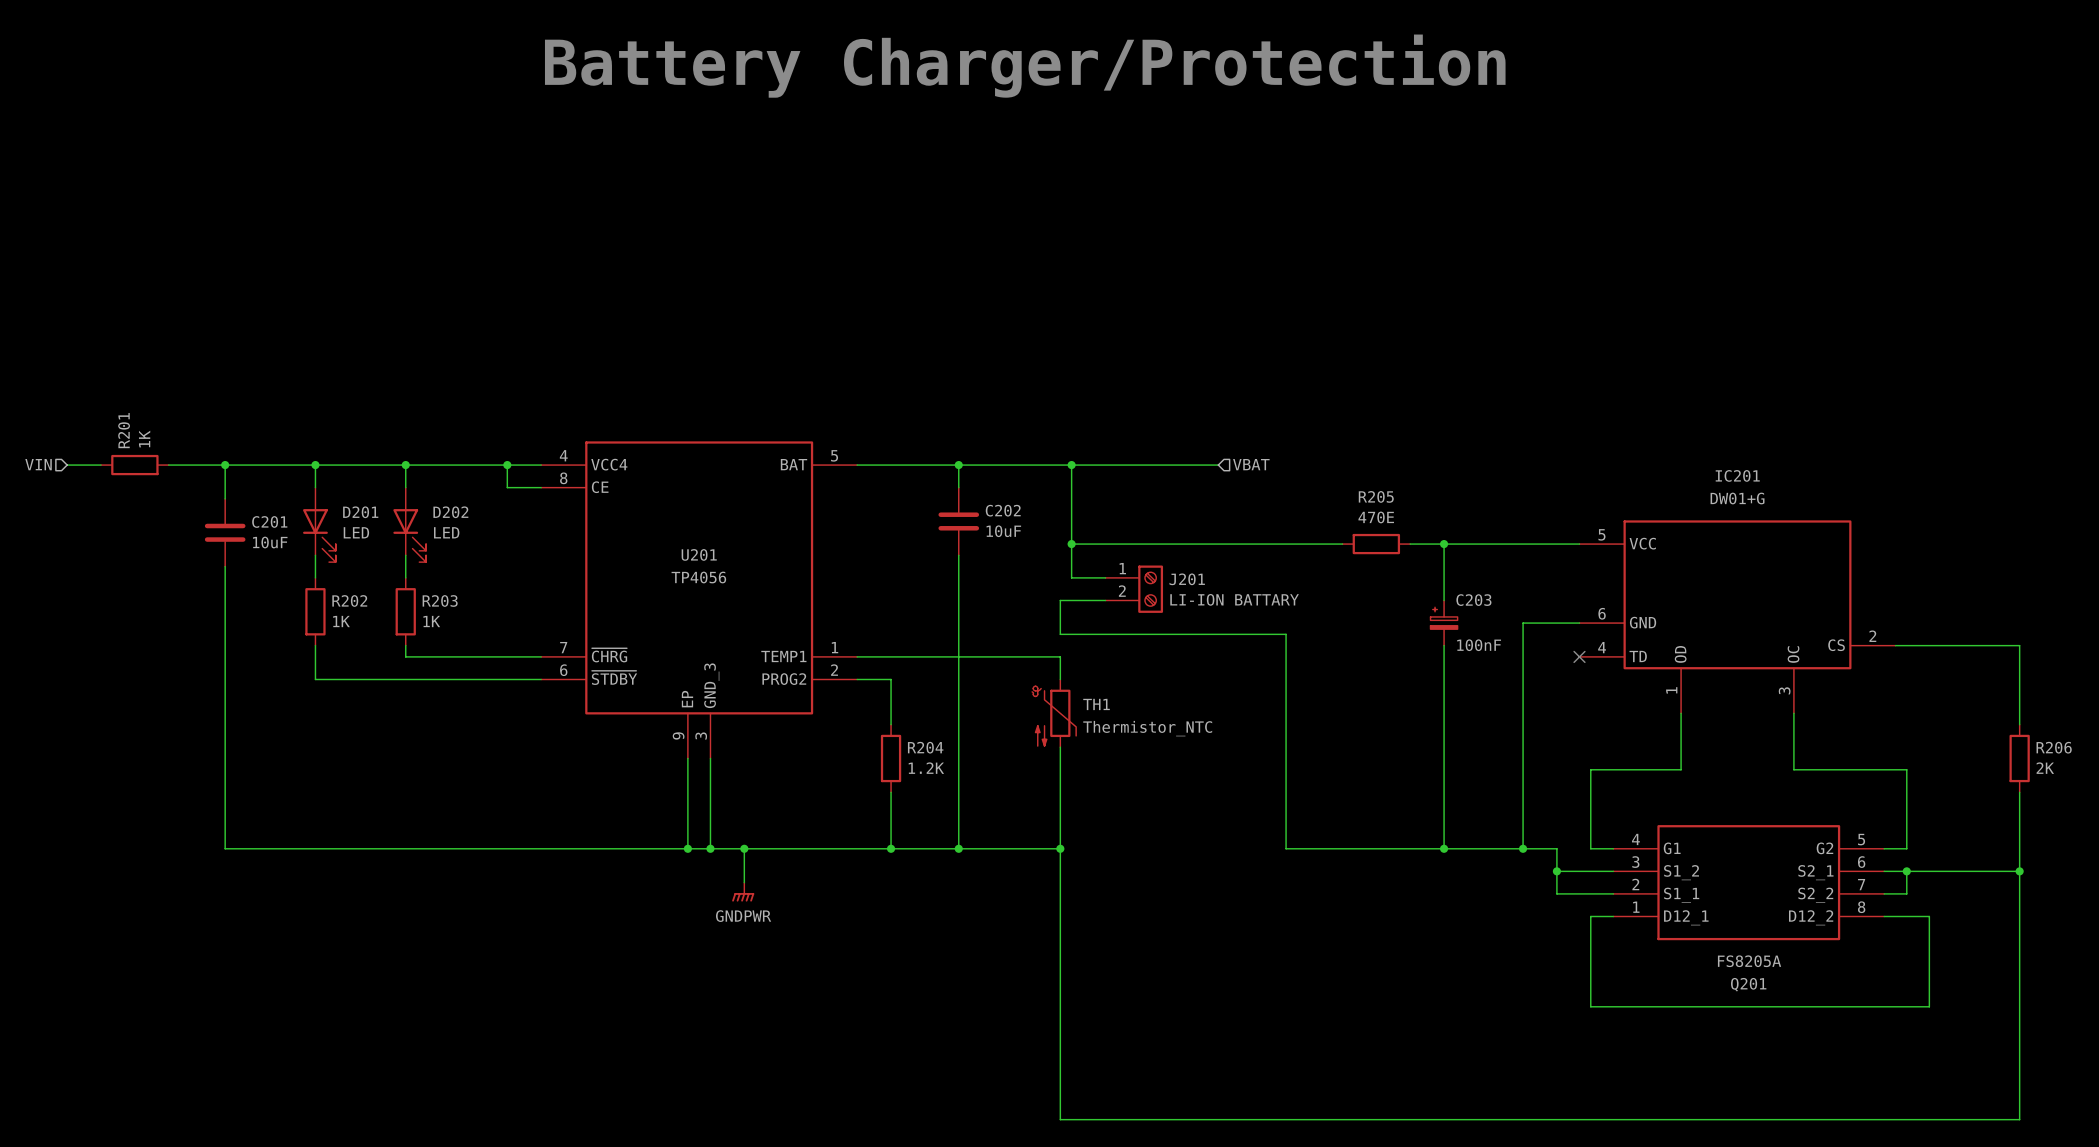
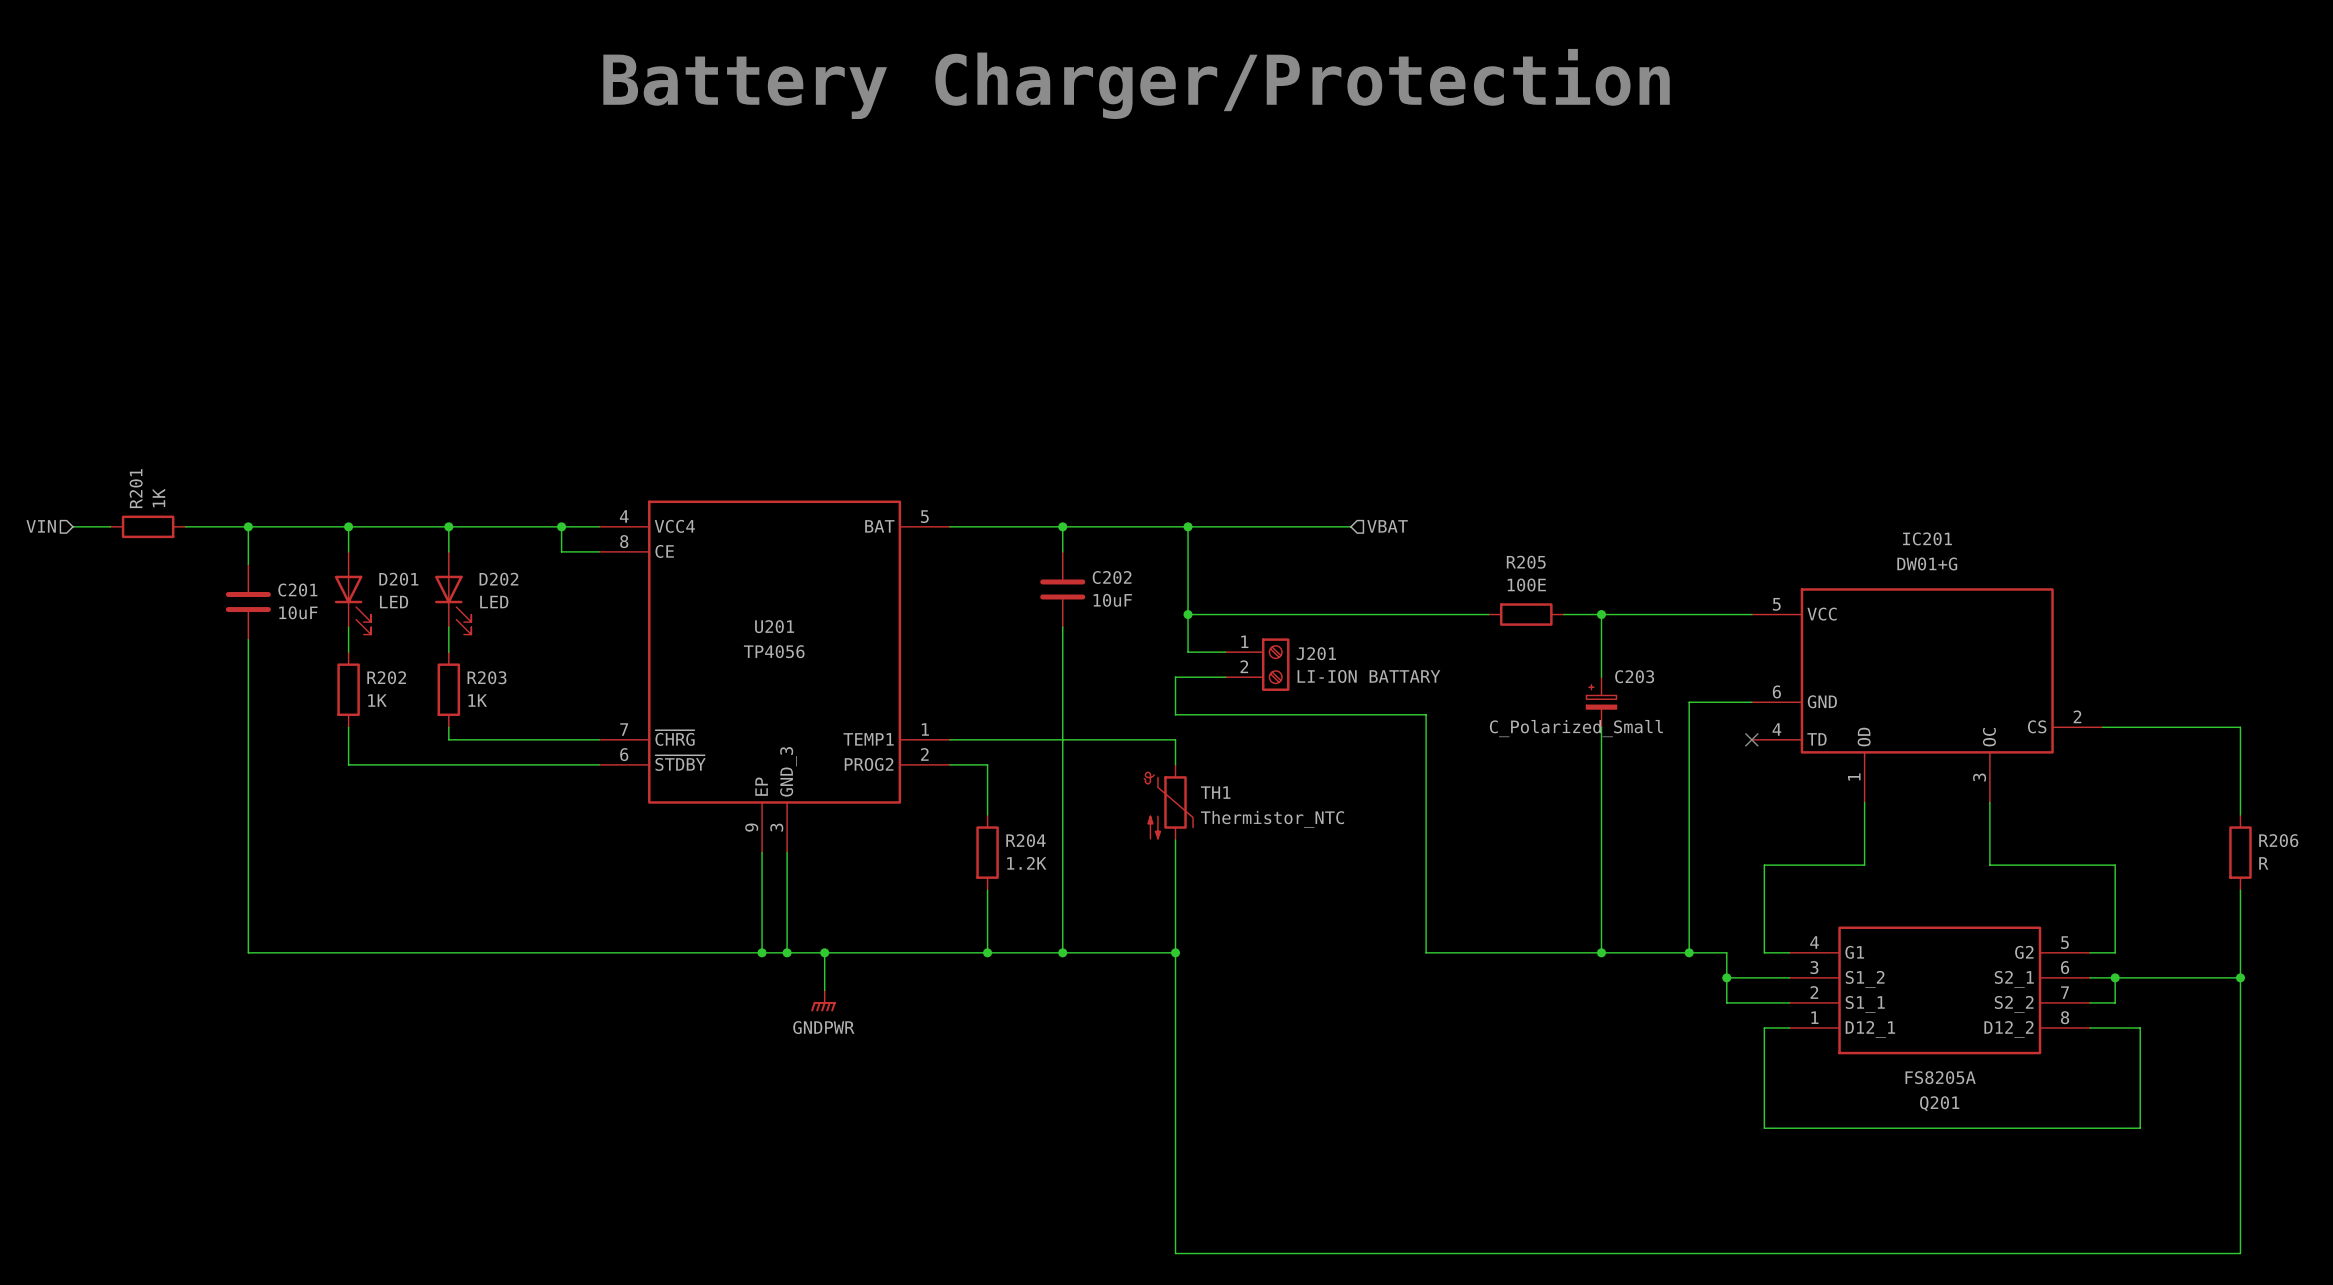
R205 value: 470E (1376, 517) -> 100E (1526, 585)
C203 value: 100nF (1479, 645) -> C_Polarized_Small (1576, 728)
R206 value: 2K (2045, 768) -> R (2263, 863)

